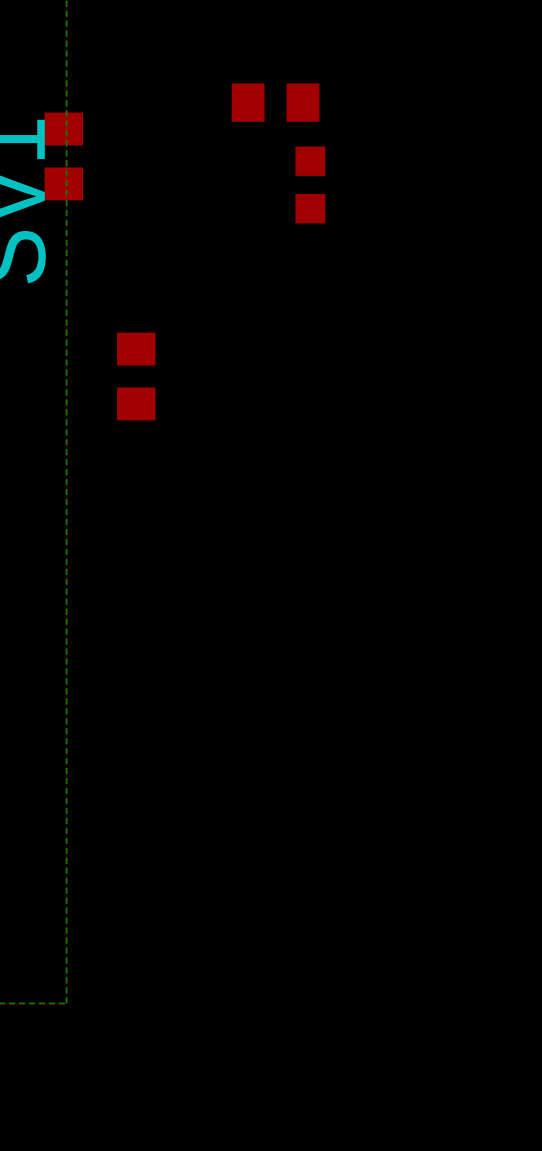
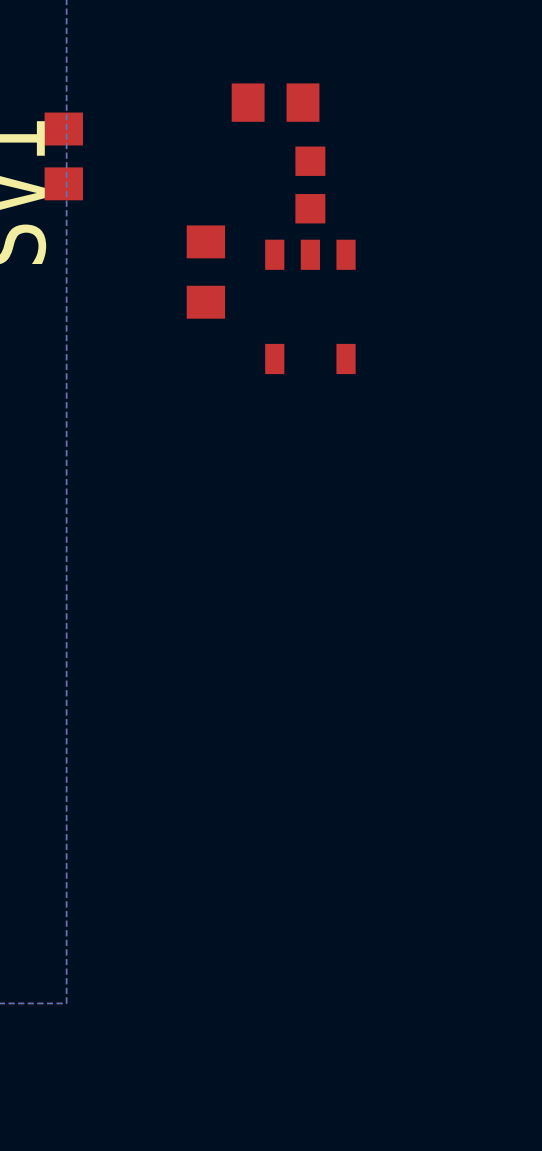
part: none -> (205, 272)
part: none -> (310, 306)
part: (136, 376) -> none

